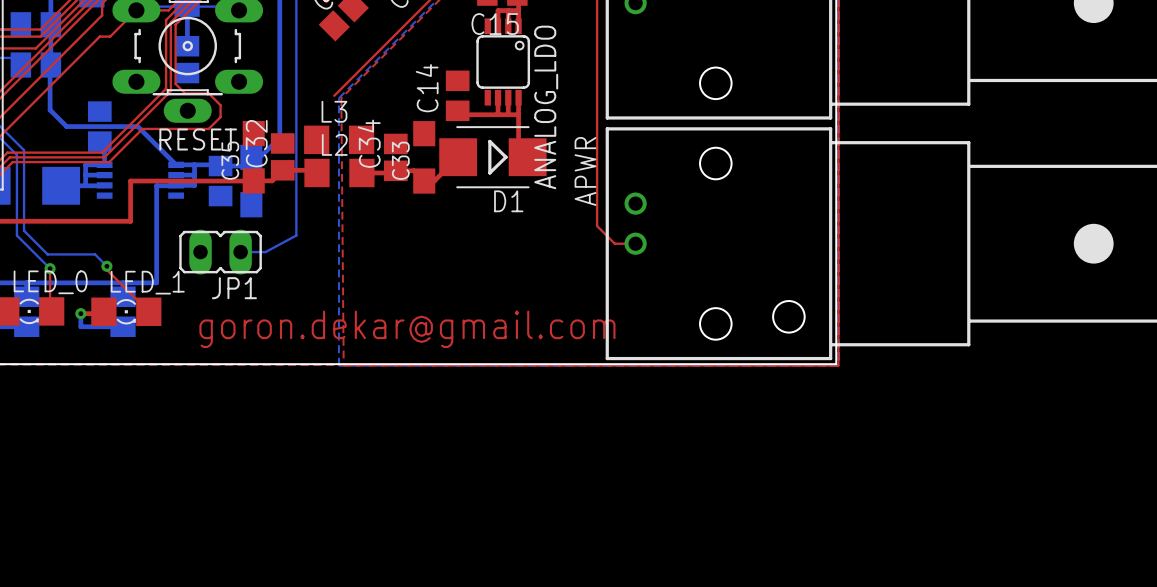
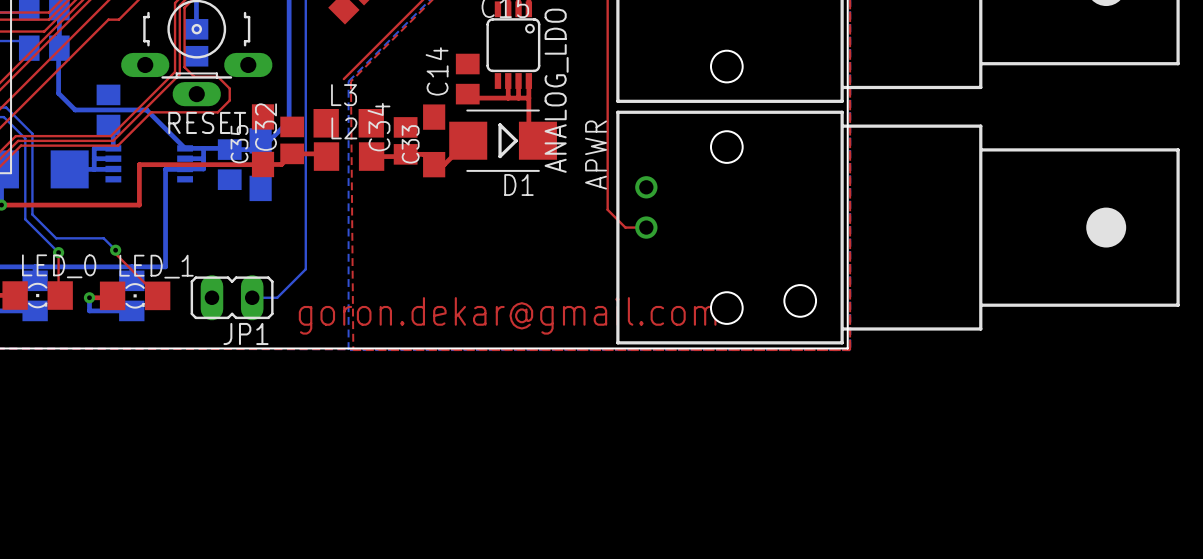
bottom track: (296, 235) (265, 252) (240, 252) -> (305, 219) (305, 269) (277, 297) (252, 297)
JP1 position: (220, 252) -> (232, 297)
text position: goron.dekar@gmail.com (407, 329) -> goron.dekar@gmail.com (507, 315)

